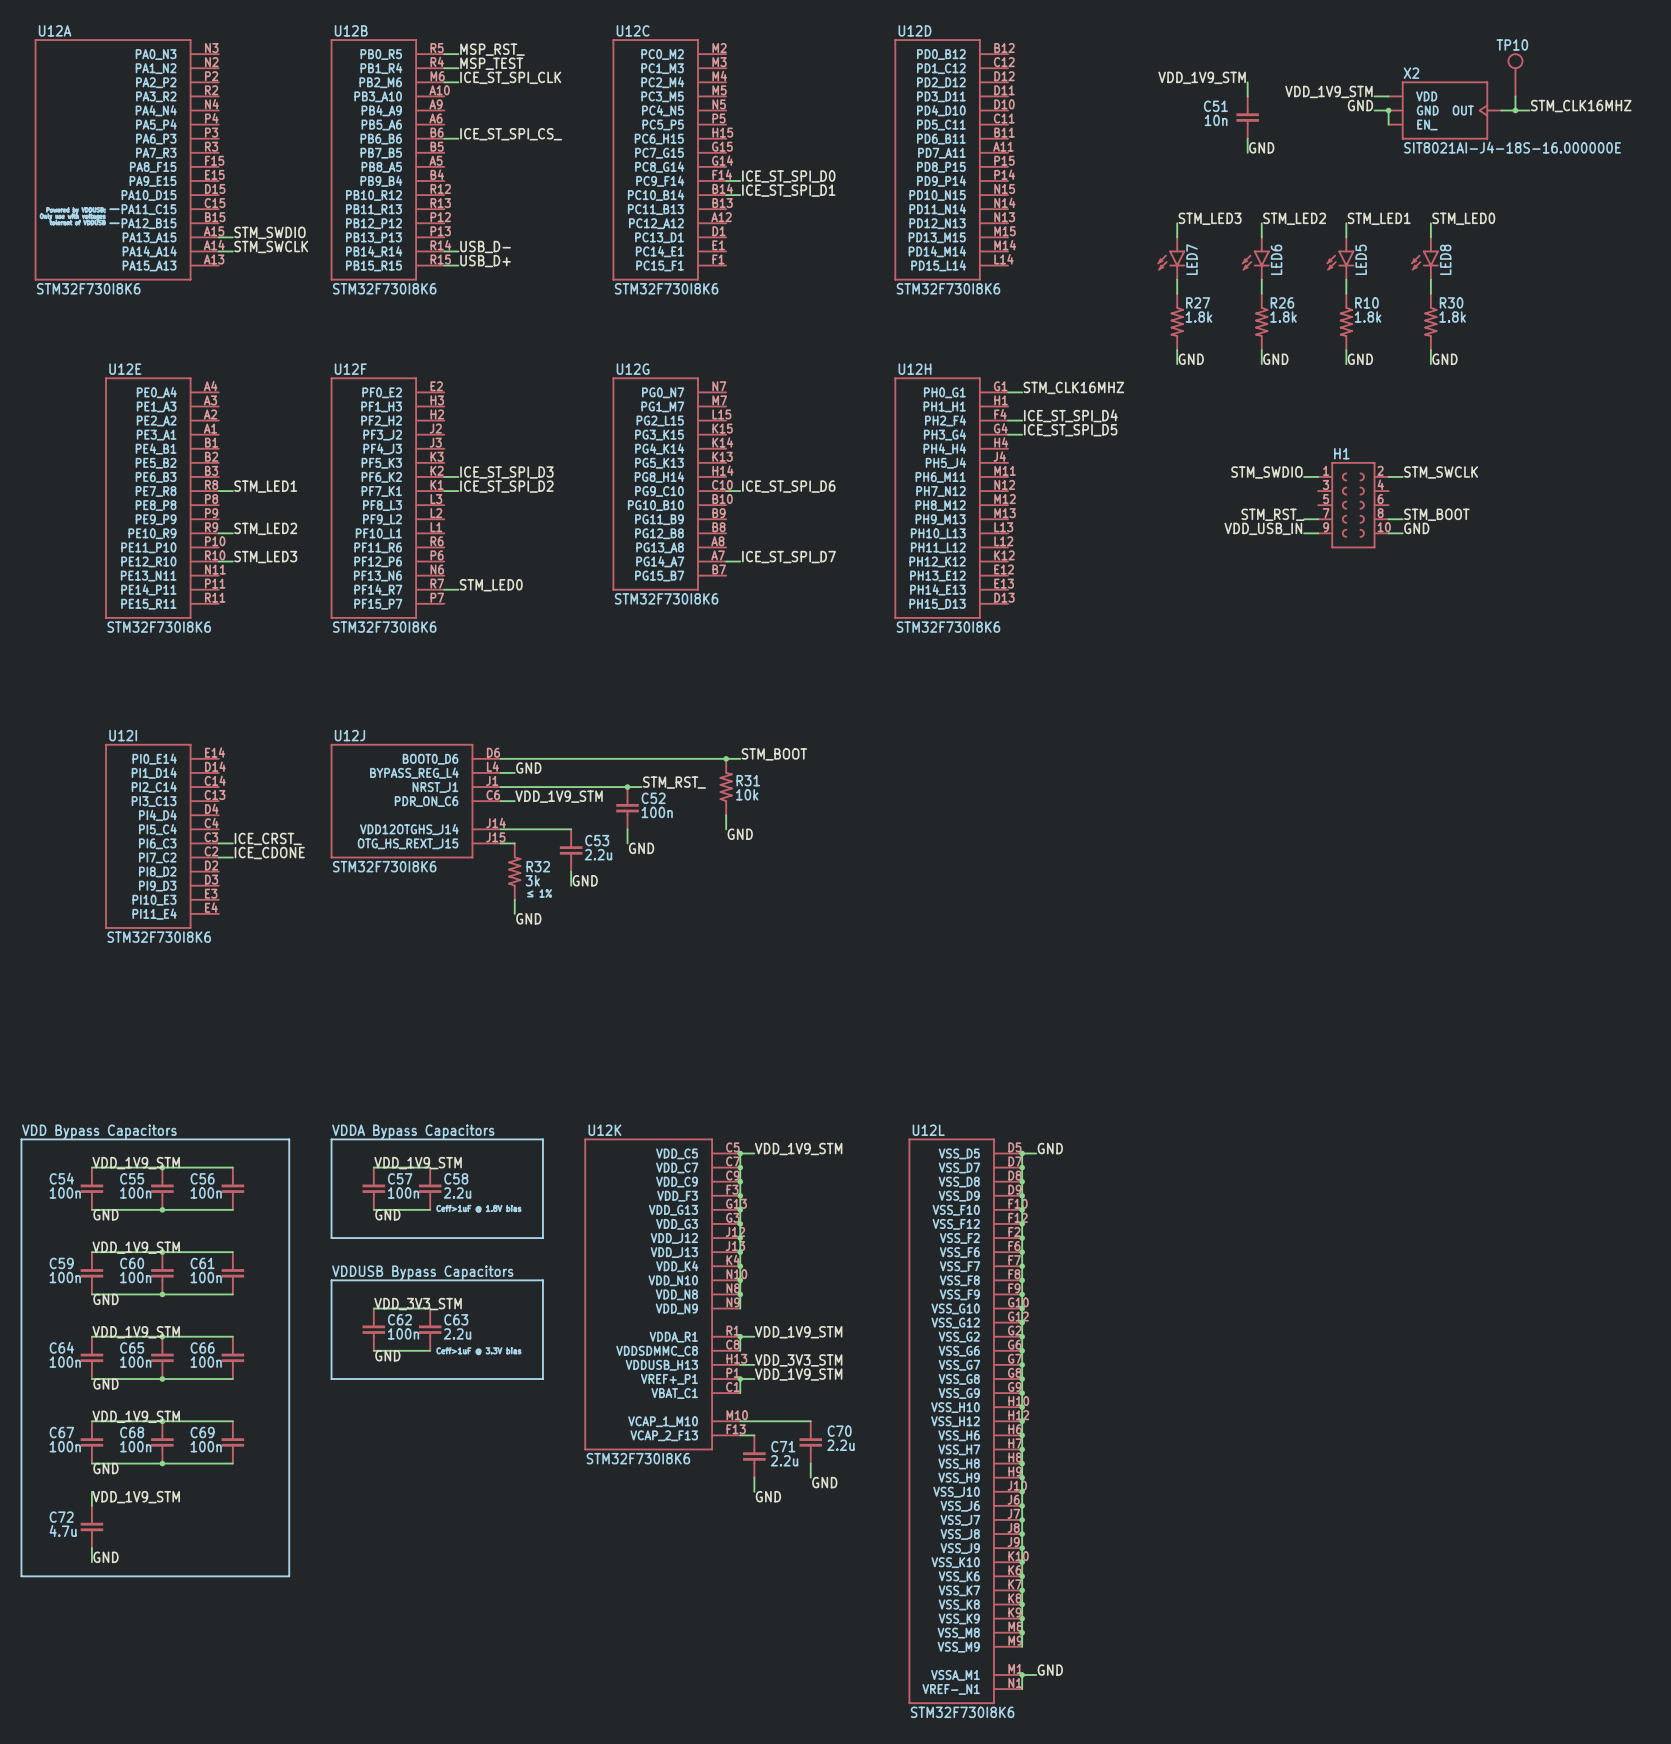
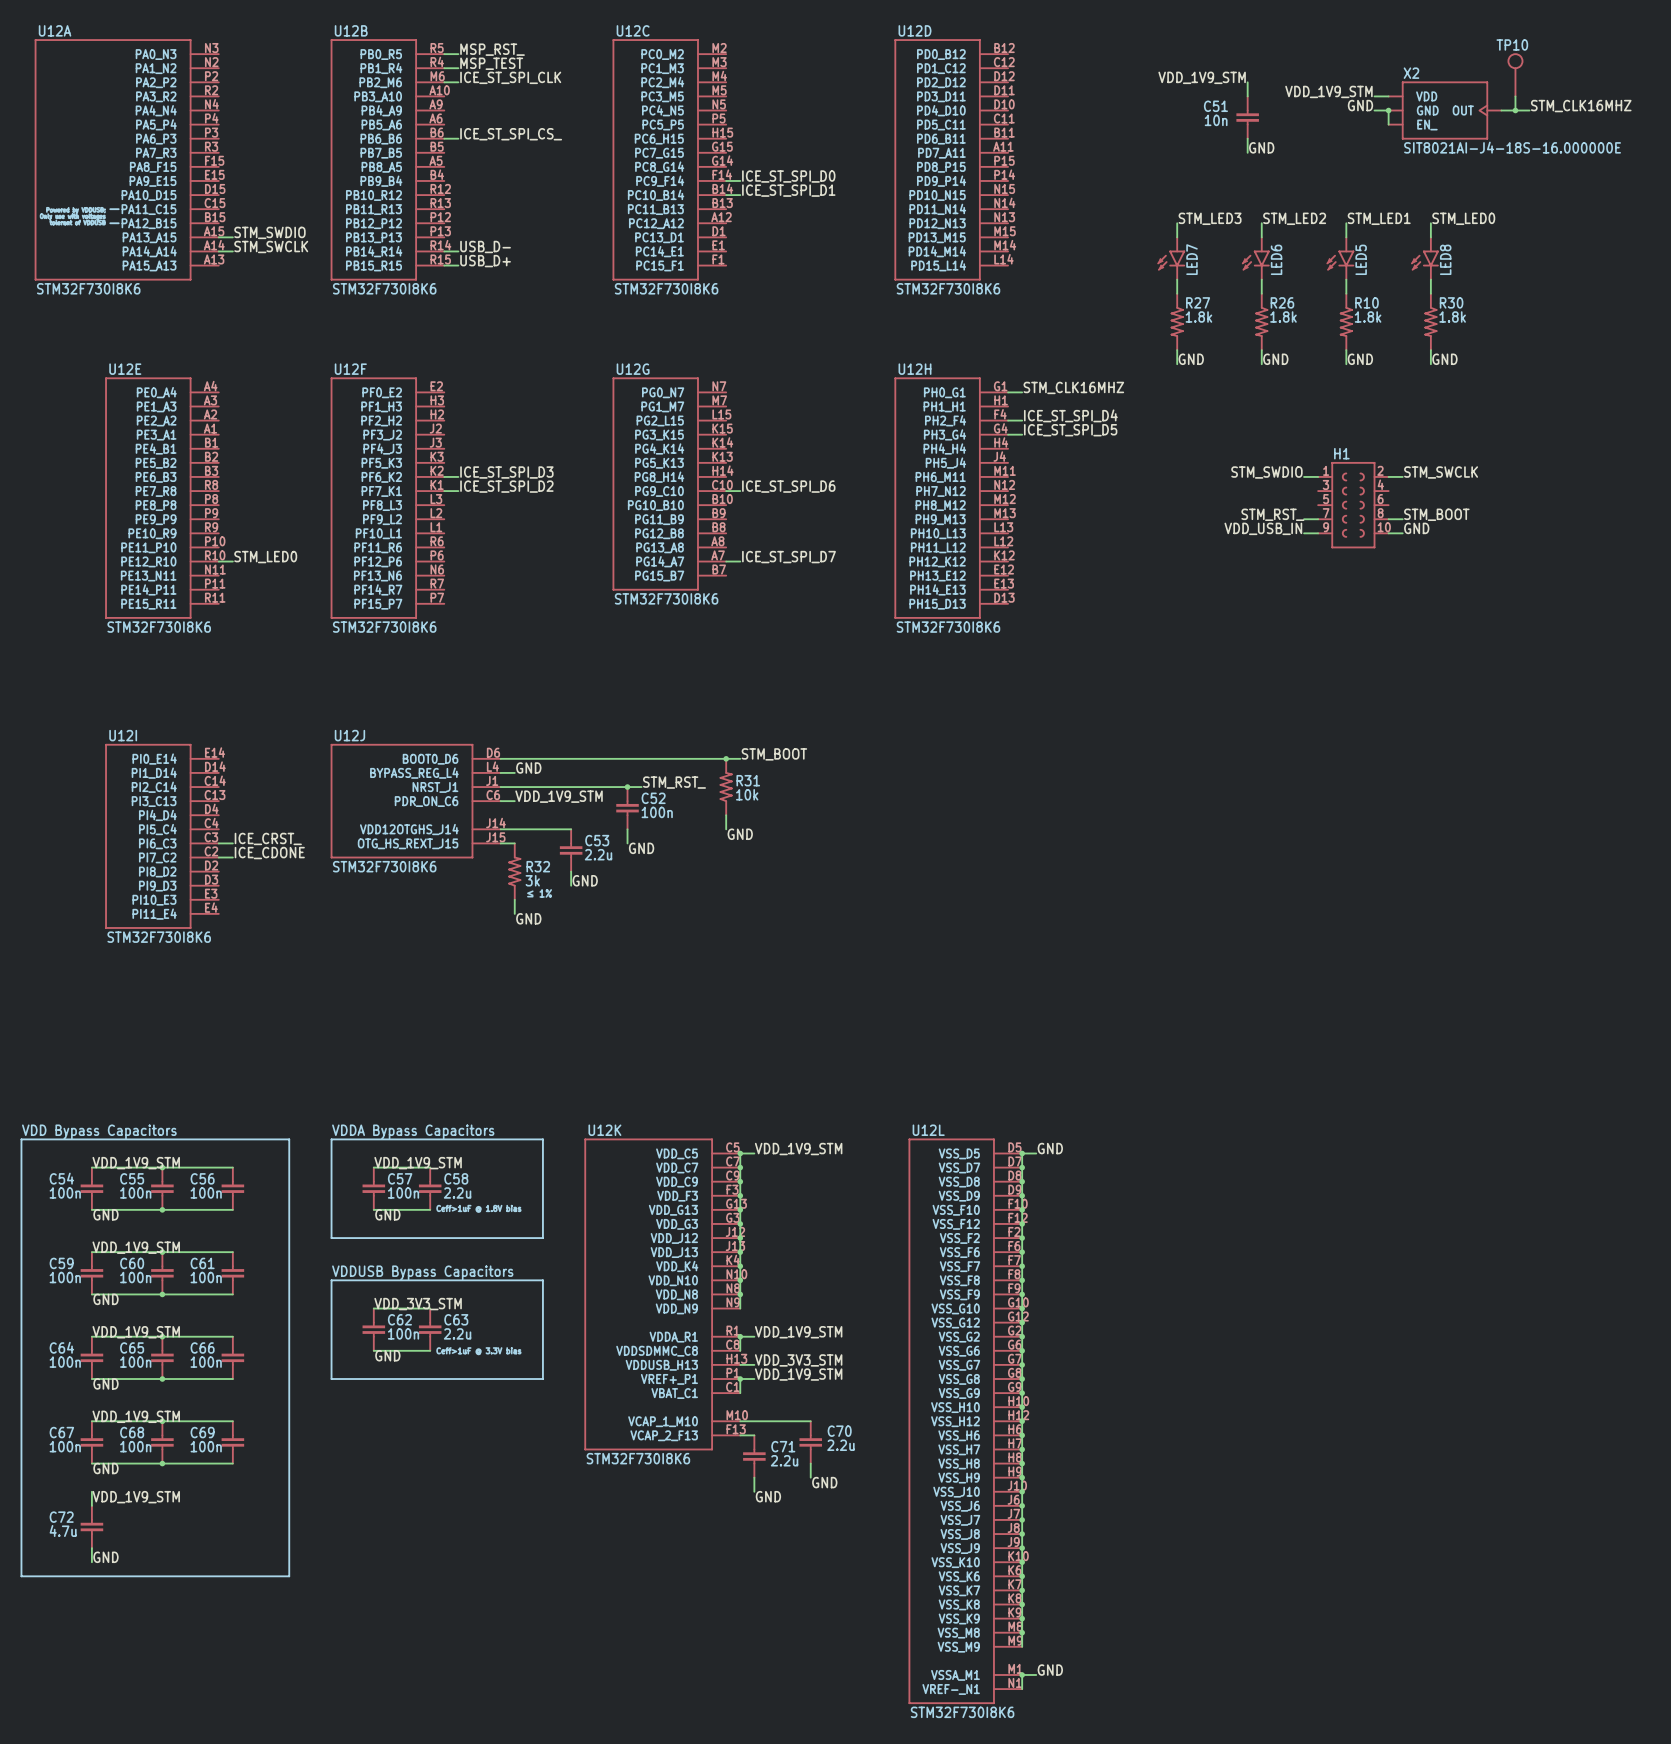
label: STM_LED1 (265, 486) -> none
wire: (218, 491) (232, 491) -> none
label: STM_LED2 (265, 528) -> none
wire: (218, 533) (232, 533) -> none
label: STM_LED3 (265, 557) -> STM_LED0 (265, 557)
label: STM_LED0 (491, 585) -> none
wire: (444, 589) (458, 589) -> none

